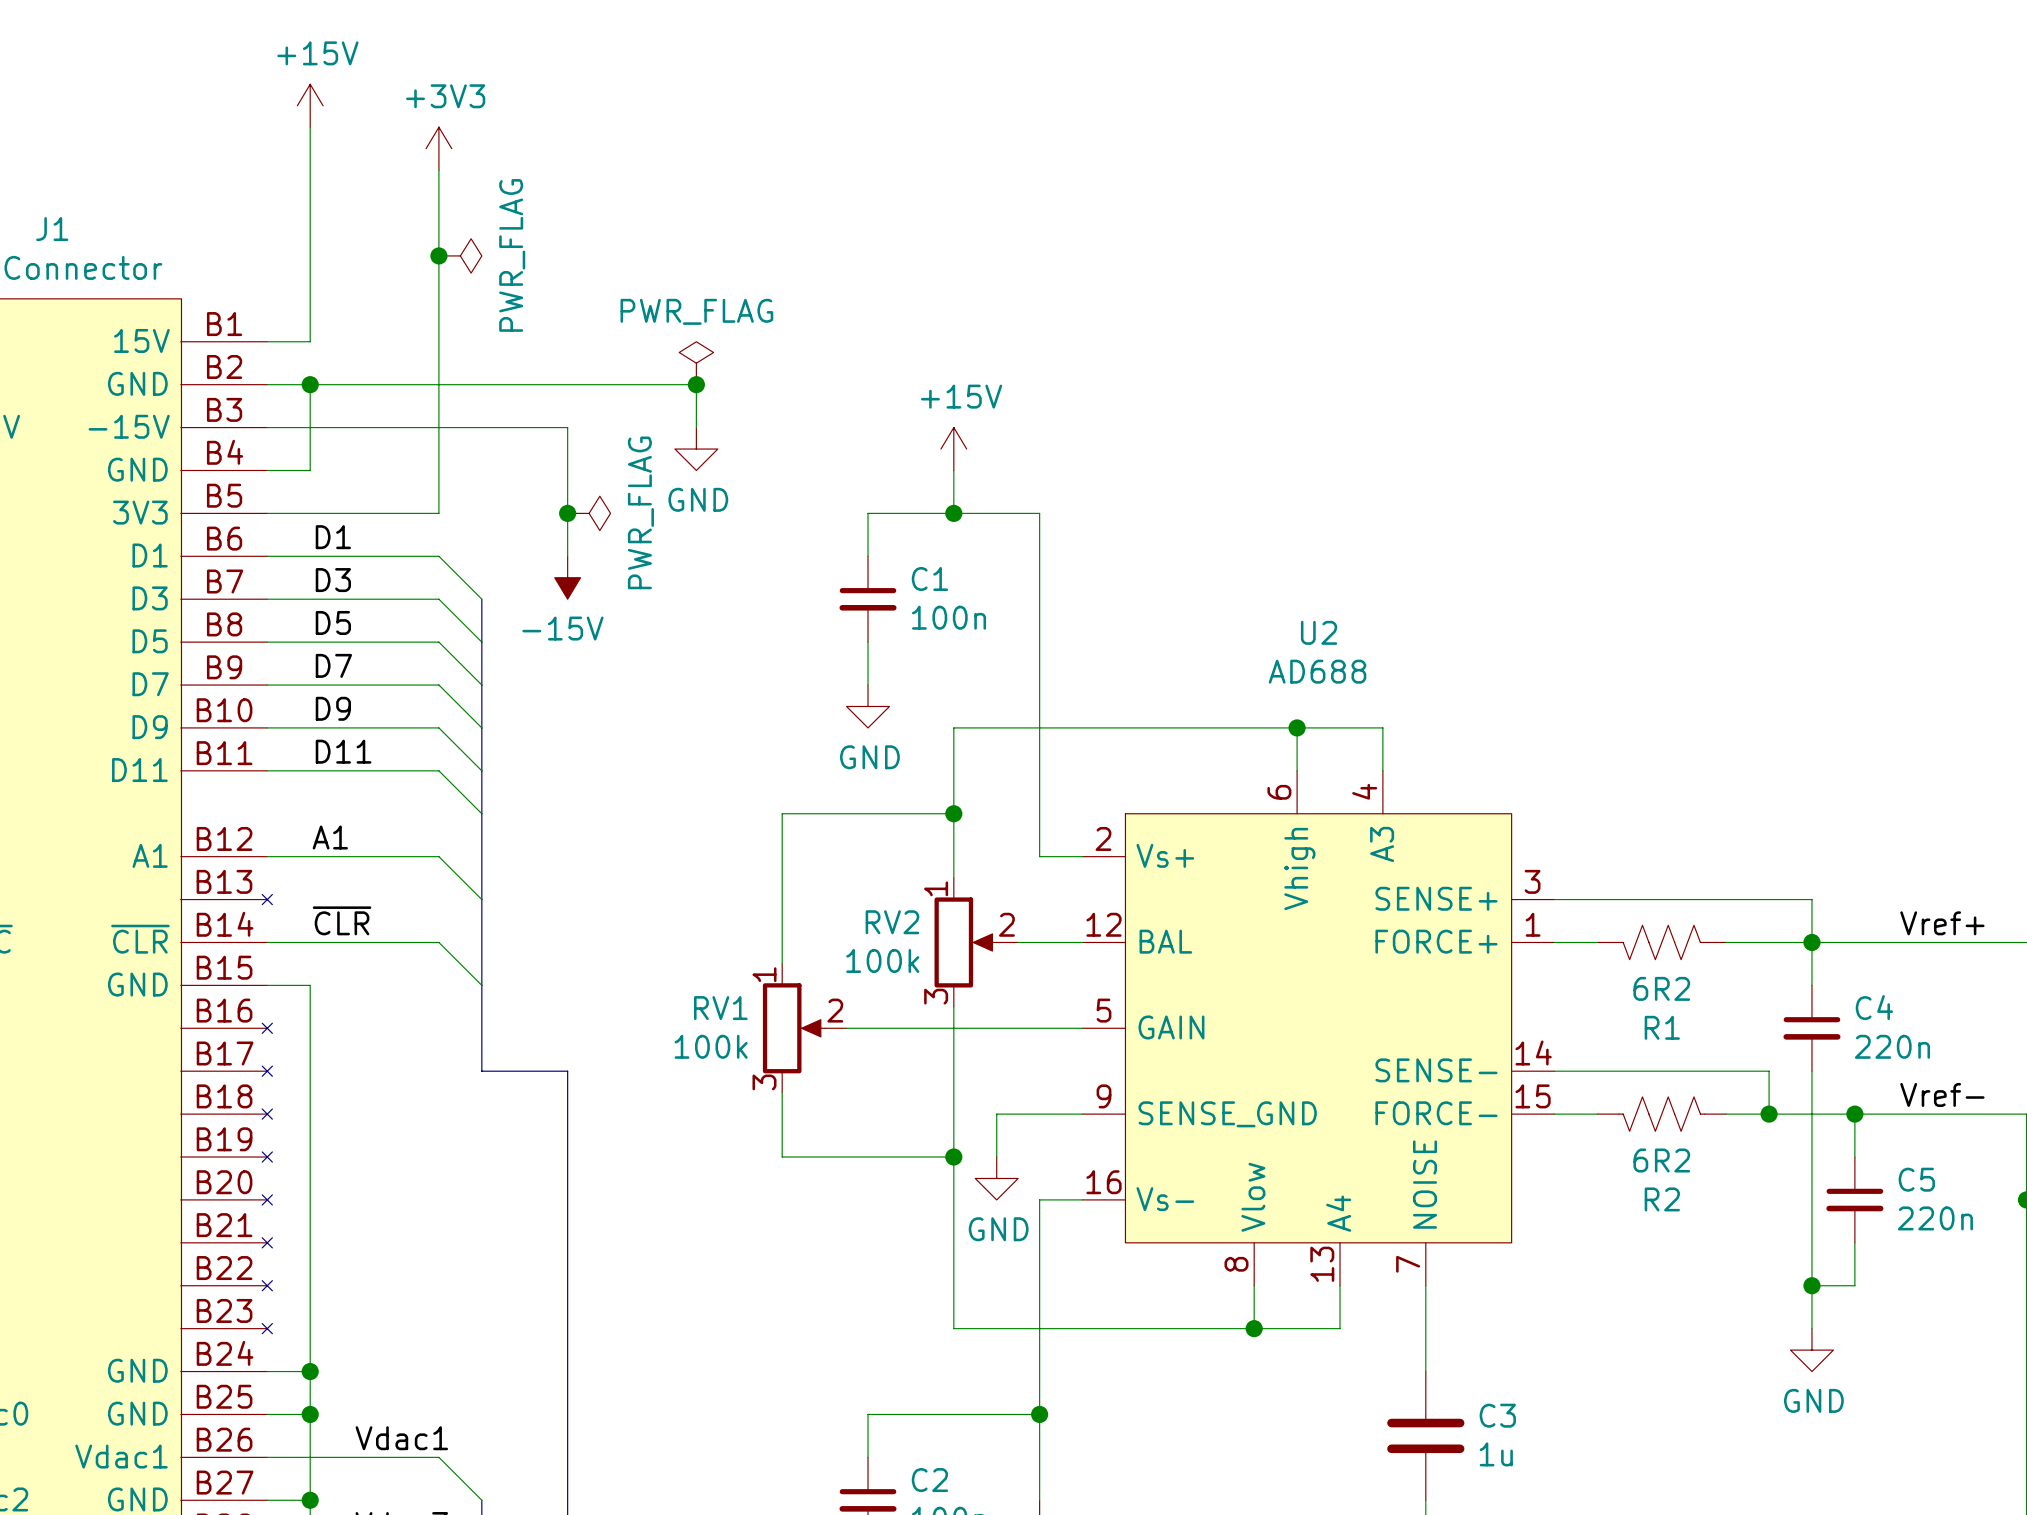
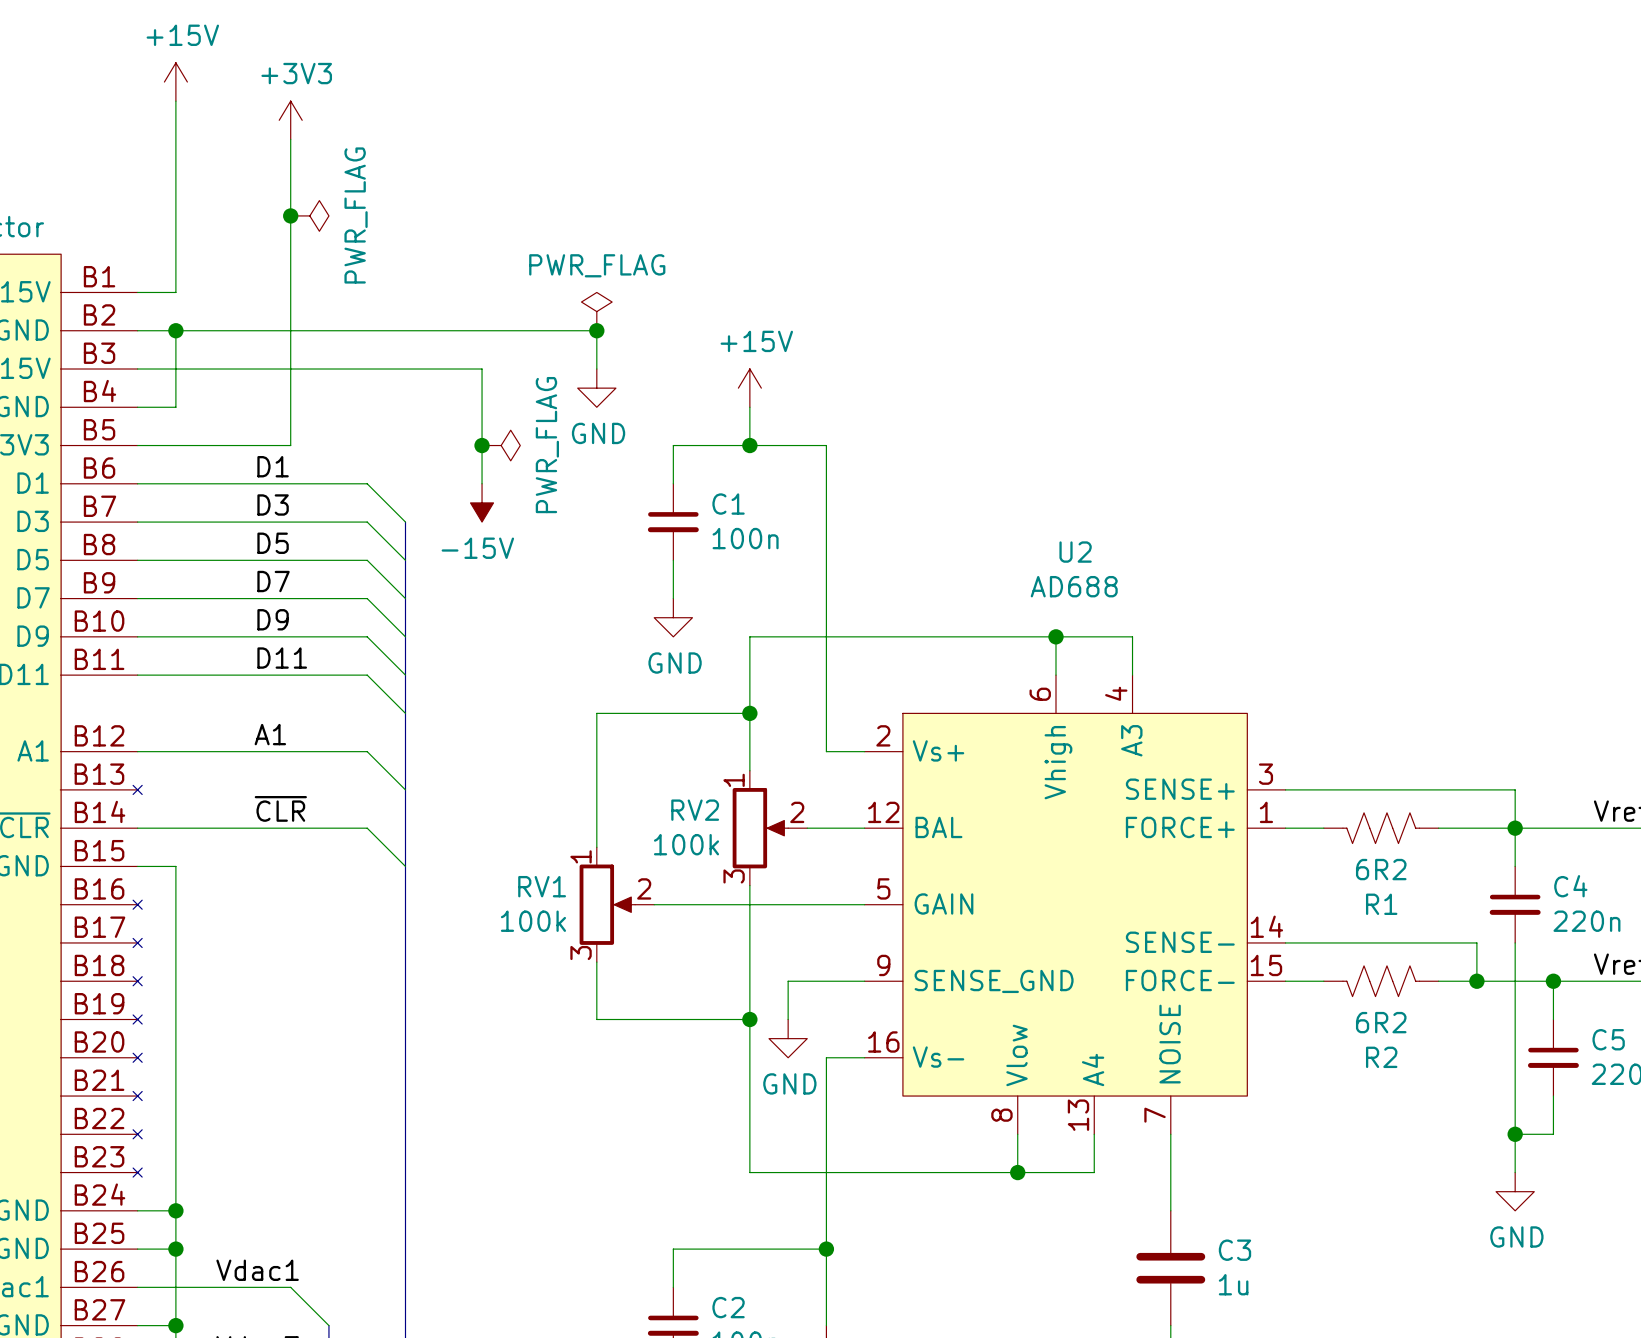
power symbol: PWR_FLAG (696, 363) -> none
power symbol: none -> PWR_FLAG (596, 311)
wire: (696, 384) (696, 427) -> (520, 330) (596, 330) (596, 369)
junction: (696, 384) -> none
junction: none -> (596, 330)
wire: (567, 427) (567, 556) -> (405, 369) (482, 369) (482, 483)
power symbol position: GND (696, 449) -> GND (596, 388)
junction: (567, 513) -> none
power symbol: PWR_FLAG (589, 513) -> none
junction: none -> (482, 445)
power symbol: none -> PWR_FLAG (501, 445)
label position: D1 (333, 537) -> D1 (273, 466)
wire: (438, 556) (481, 599) -> (290, 483) (367, 483) (405, 522)
power symbol position: -15V (567, 577) -> -15V (482, 502)
label position: D3 (333, 580) -> D3 (273, 504)
wire: (438, 599) (481, 642) -> (290, 522) (367, 522) (405, 560)
bus: (481, 599) (481, 1071) (567, 1071) -> (405, 522) (405, 942)
label position: D5 (333, 622) -> D5 (273, 543)
wire: (438, 642) (481, 685) -> (290, 560) (367, 560) (405, 598)
label position: D7 (333, 665) -> D7 (273, 581)
wire: (438, 685) (481, 727) -> (290, 598) (367, 598) (405, 636)
label position: D9 (333, 708) -> D9 (273, 619)
wire: (438, 727) (481, 770) -> (290, 636) (367, 636) (405, 675)
label position: D11 (343, 751) -> D11 (282, 658)
wire: (438, 770) (481, 813) -> (290, 675) (367, 675) (405, 713)
label position: A1 (330, 837) -> A1 (270, 734)
wire: (438, 856) (481, 899) -> (290, 751) (367, 751) (405, 789)
label position: ~{CLR} (342, 920) -> ~{CLR} (280, 808)
wire: (438, 942) (481, 985) -> (290, 828) (367, 828) (405, 866)

